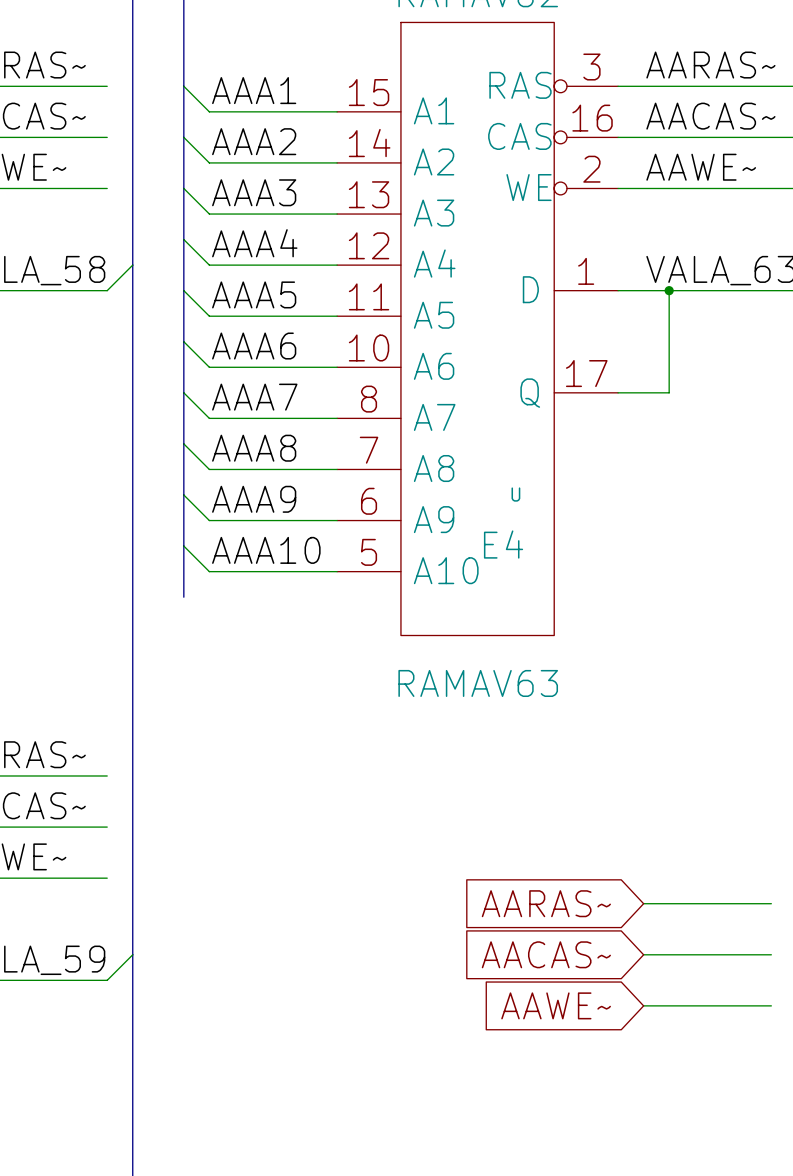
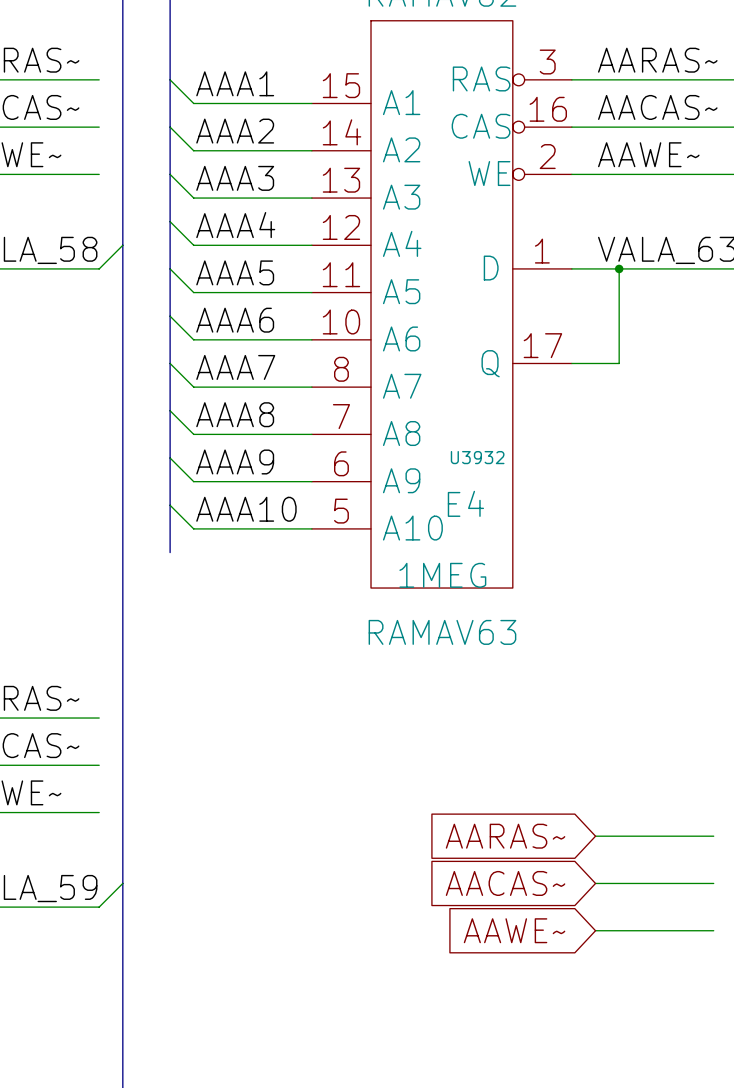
U name: U (515, 494) -> U3932 (477, 457)
U value: none -> 1MEG (442, 575)

